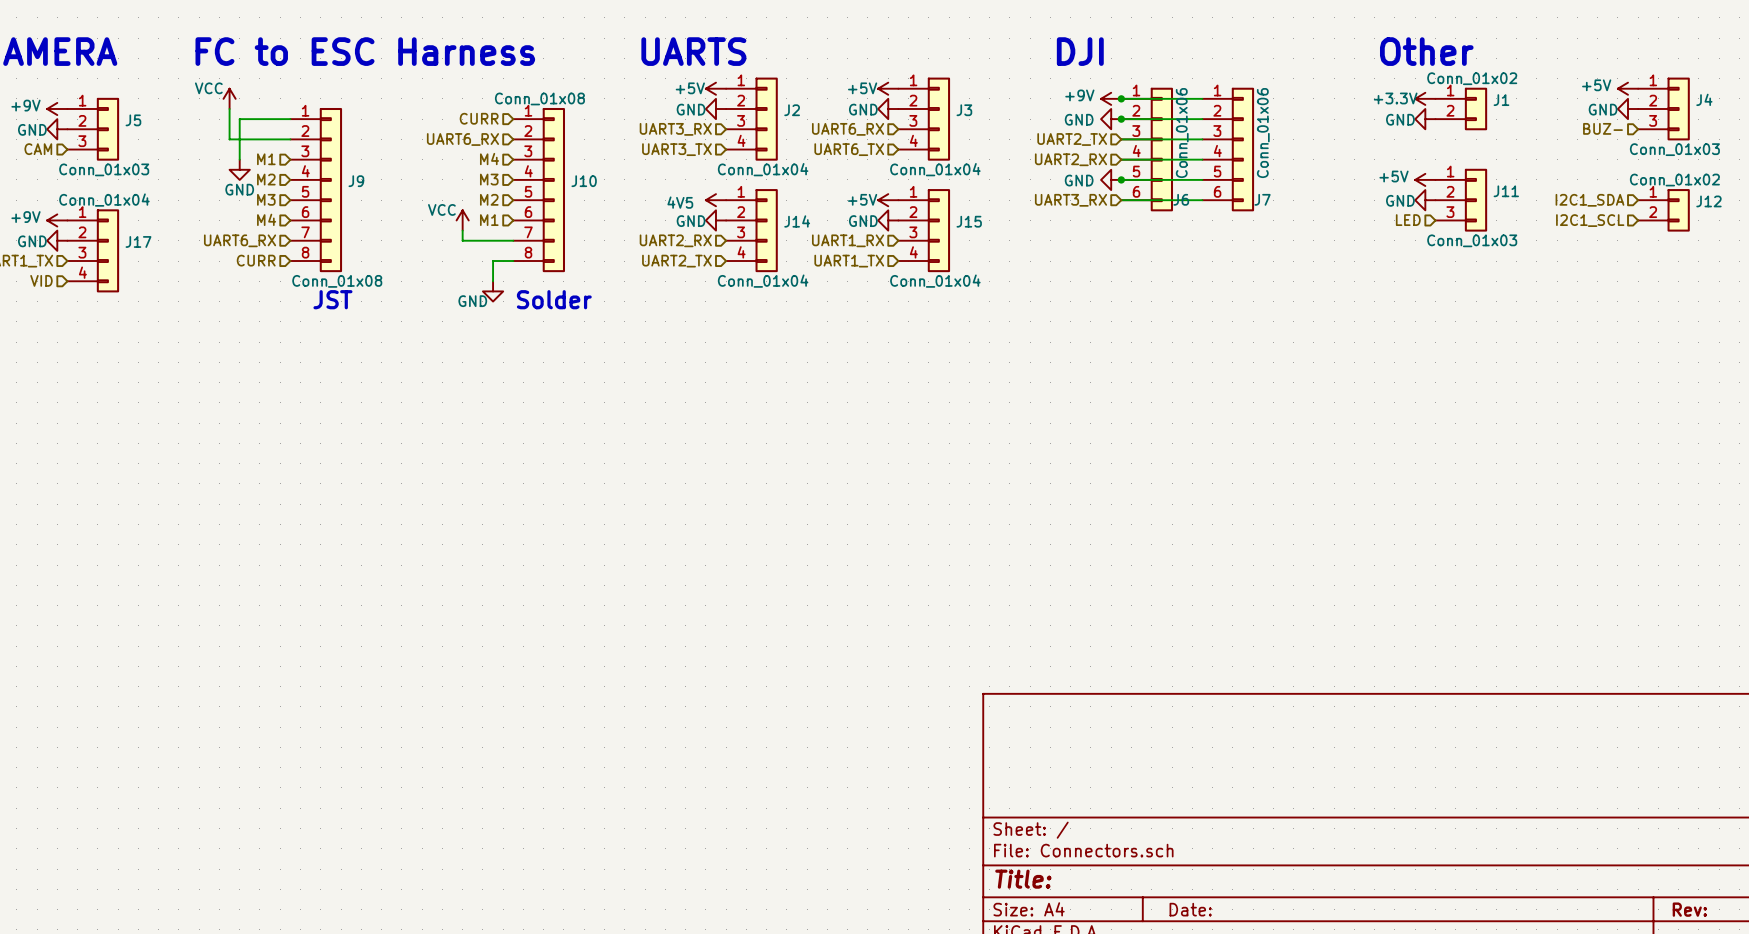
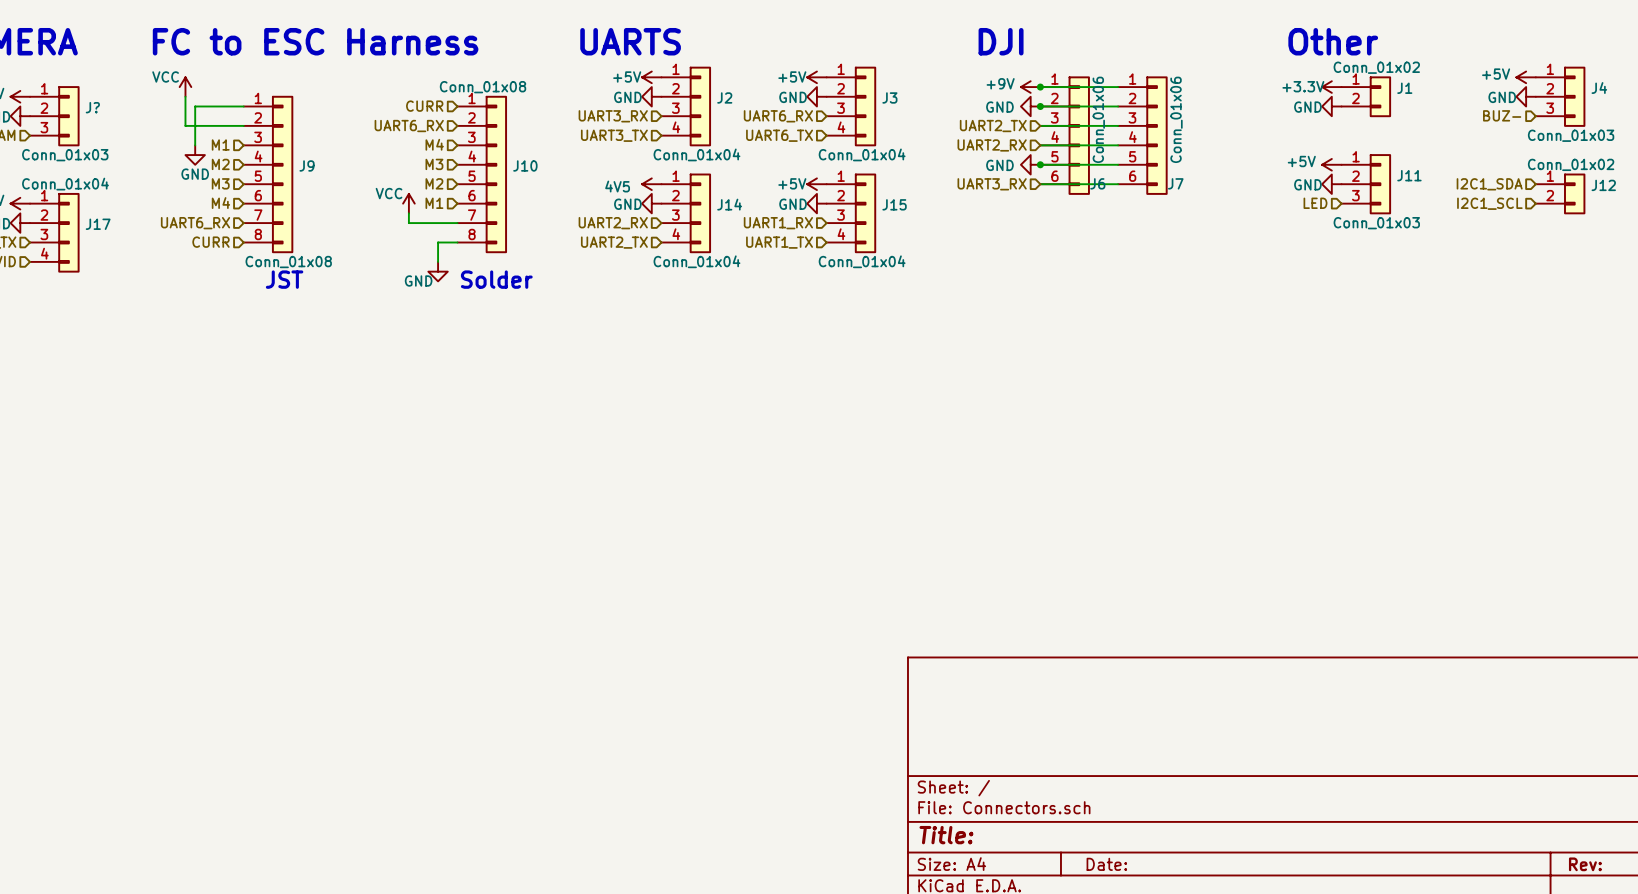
J5 name: J5 (133, 120) -> J? (92, 107)

